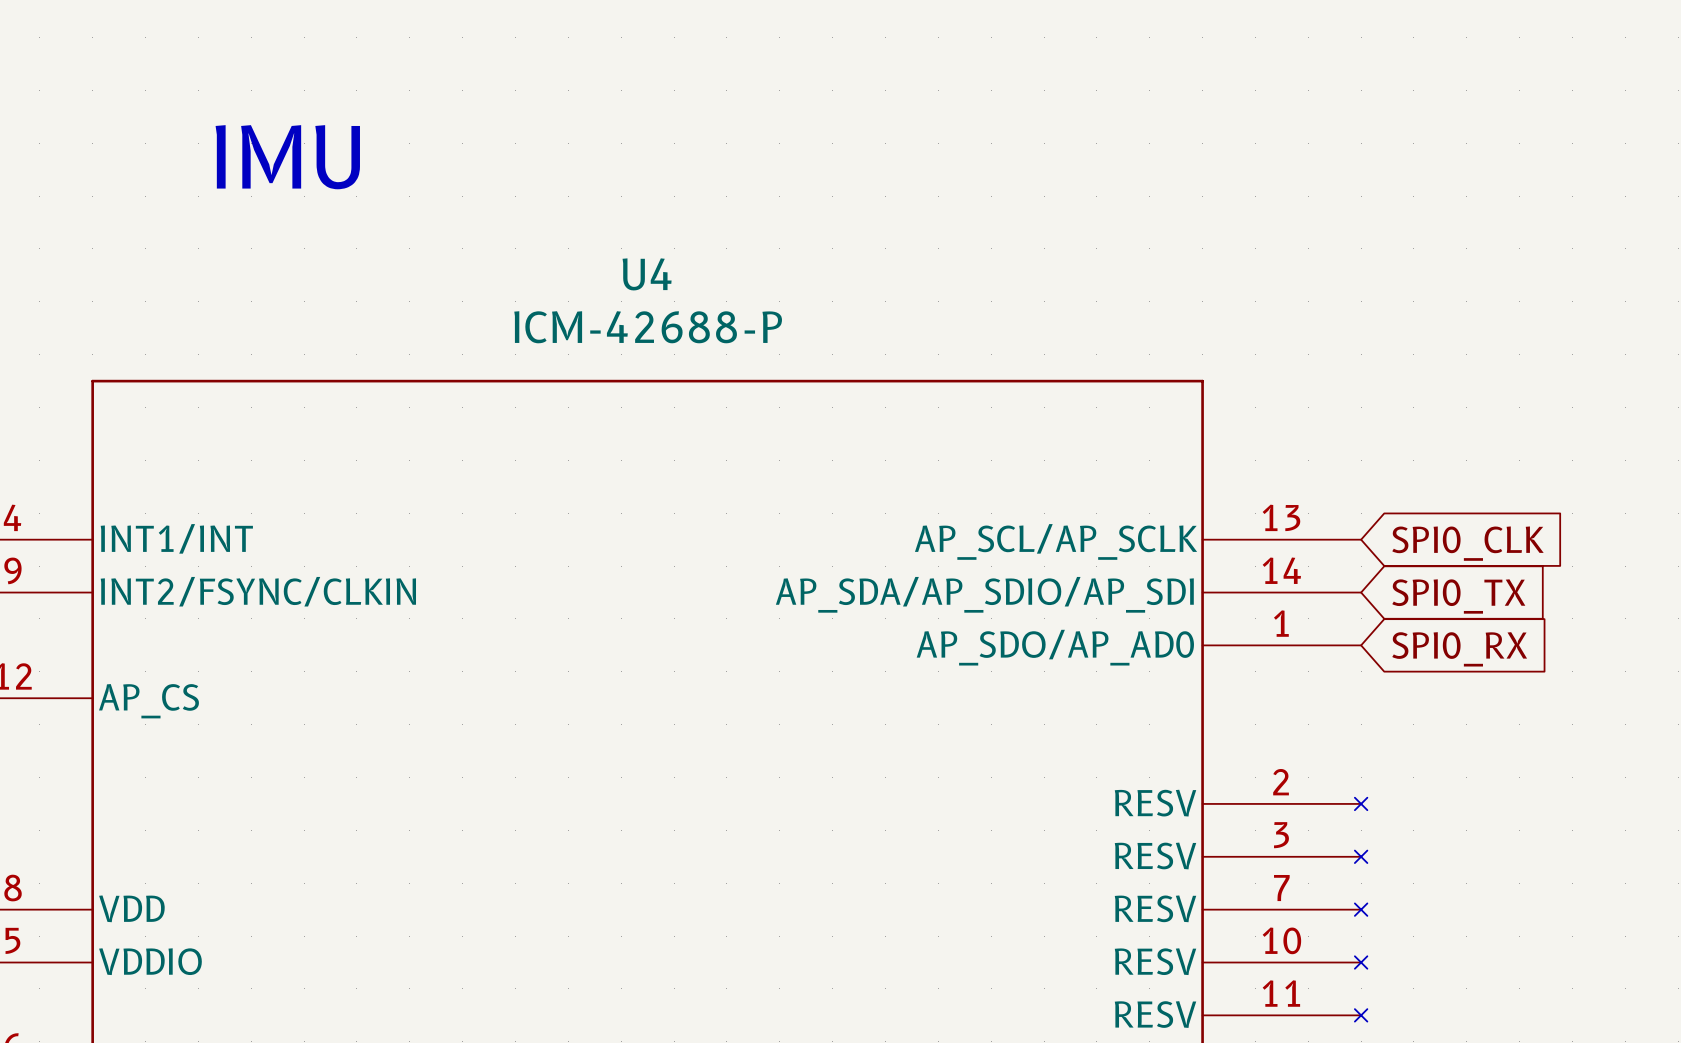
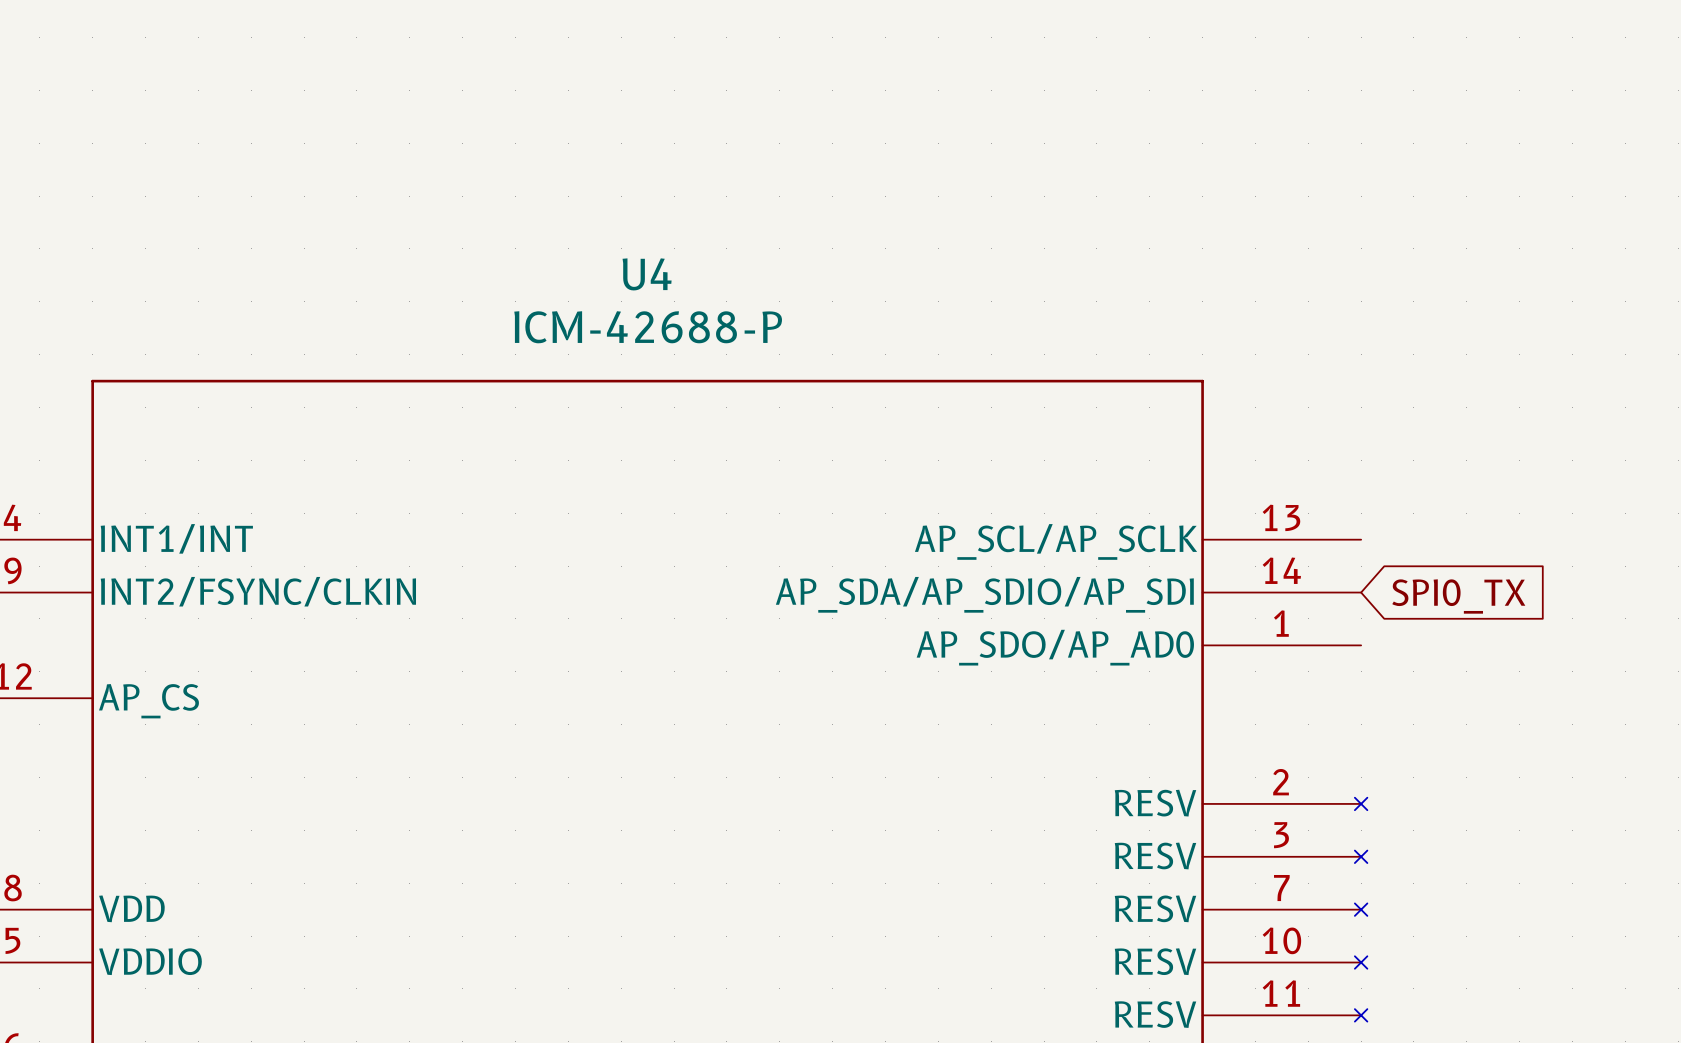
text: IMU (287, 157) -> none
global label: SPI0_CLK (1467, 543) -> none
global label: SPI0_RX (1459, 649) -> none

